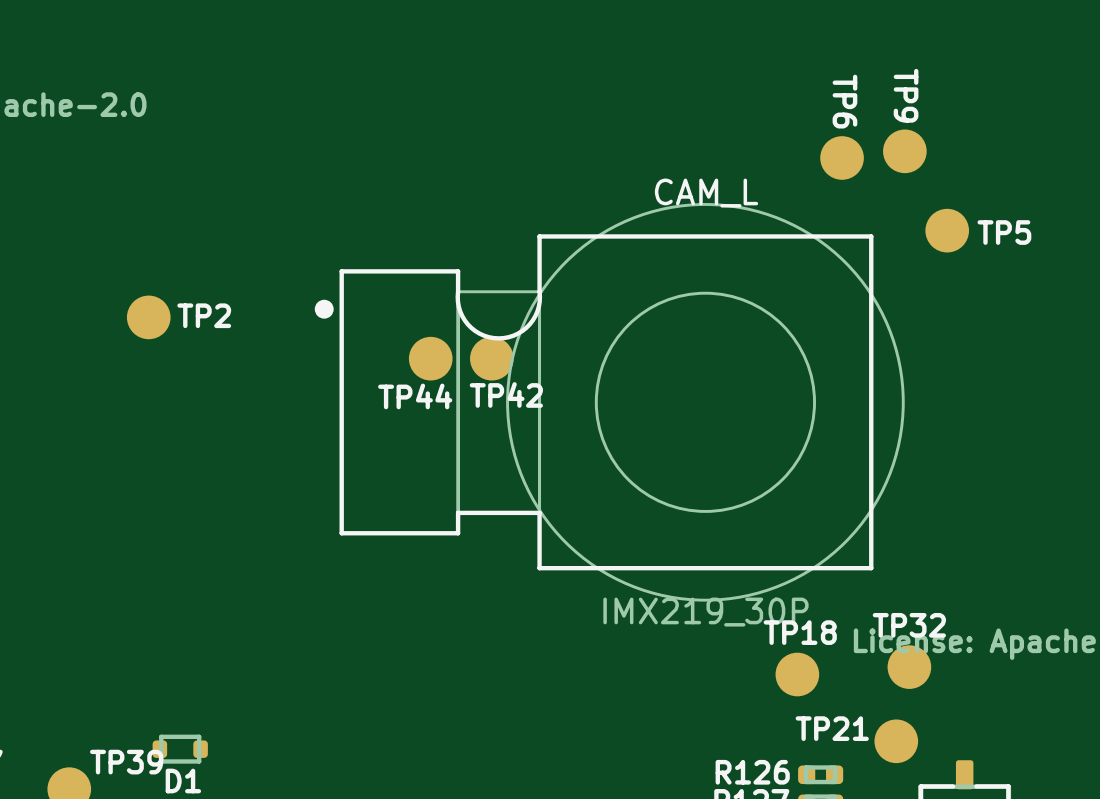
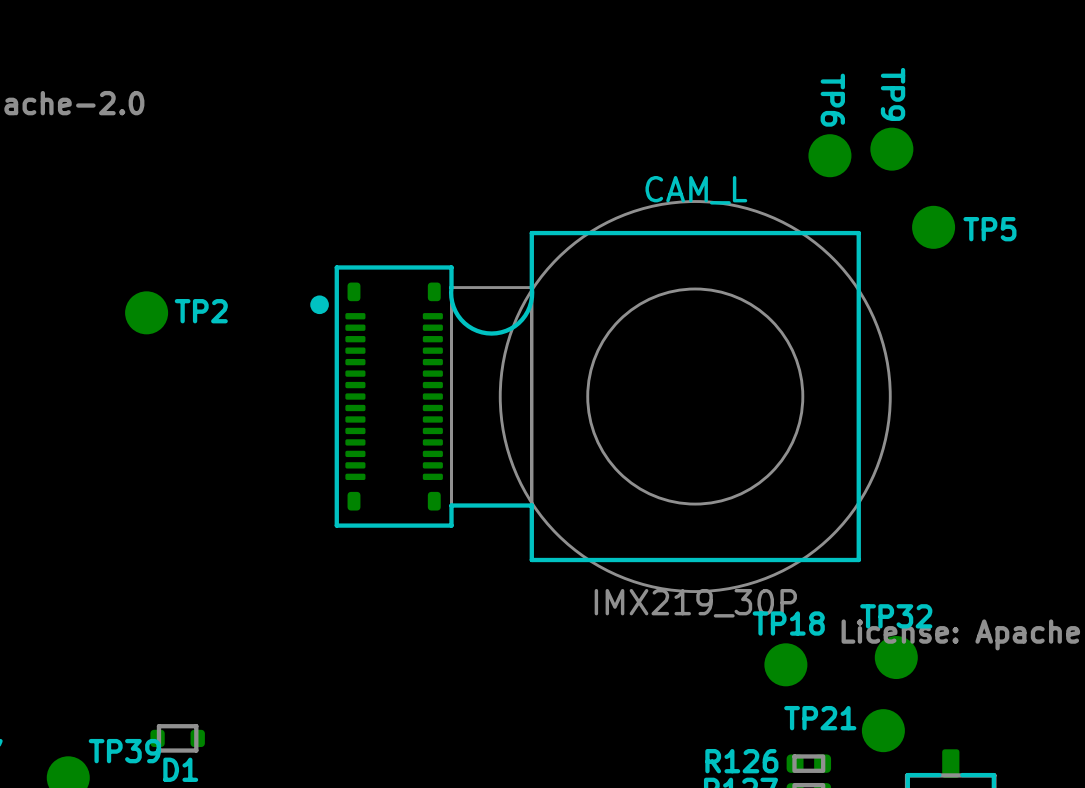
CAM_L footprint: [314, 203, 905, 602] -> [310, 200, 892, 593]
TP44: (430, 358) -> none
TP42: (491, 358) -> none

